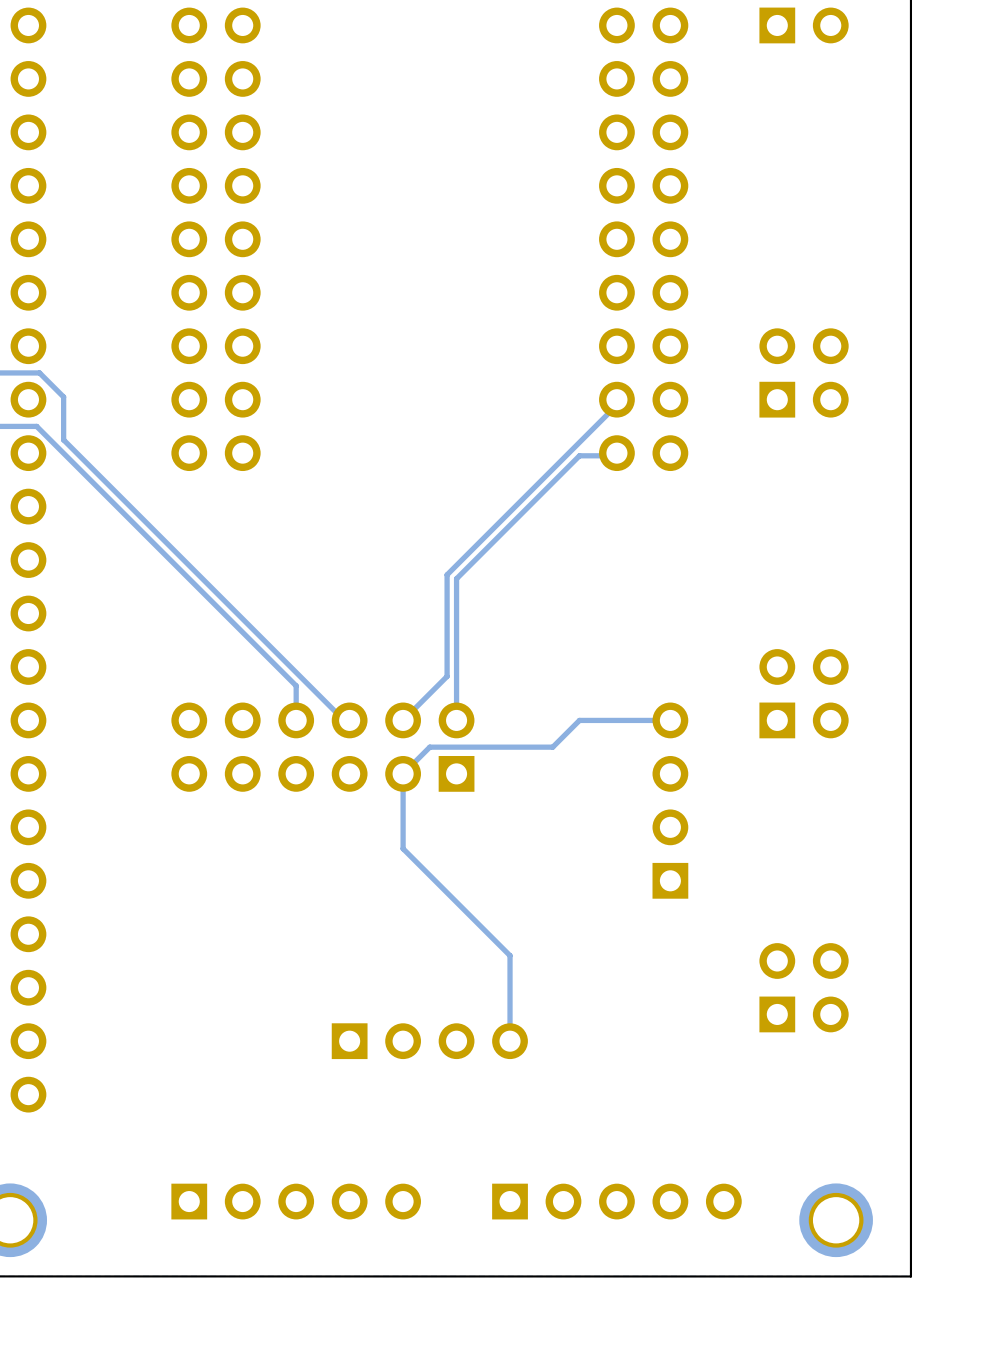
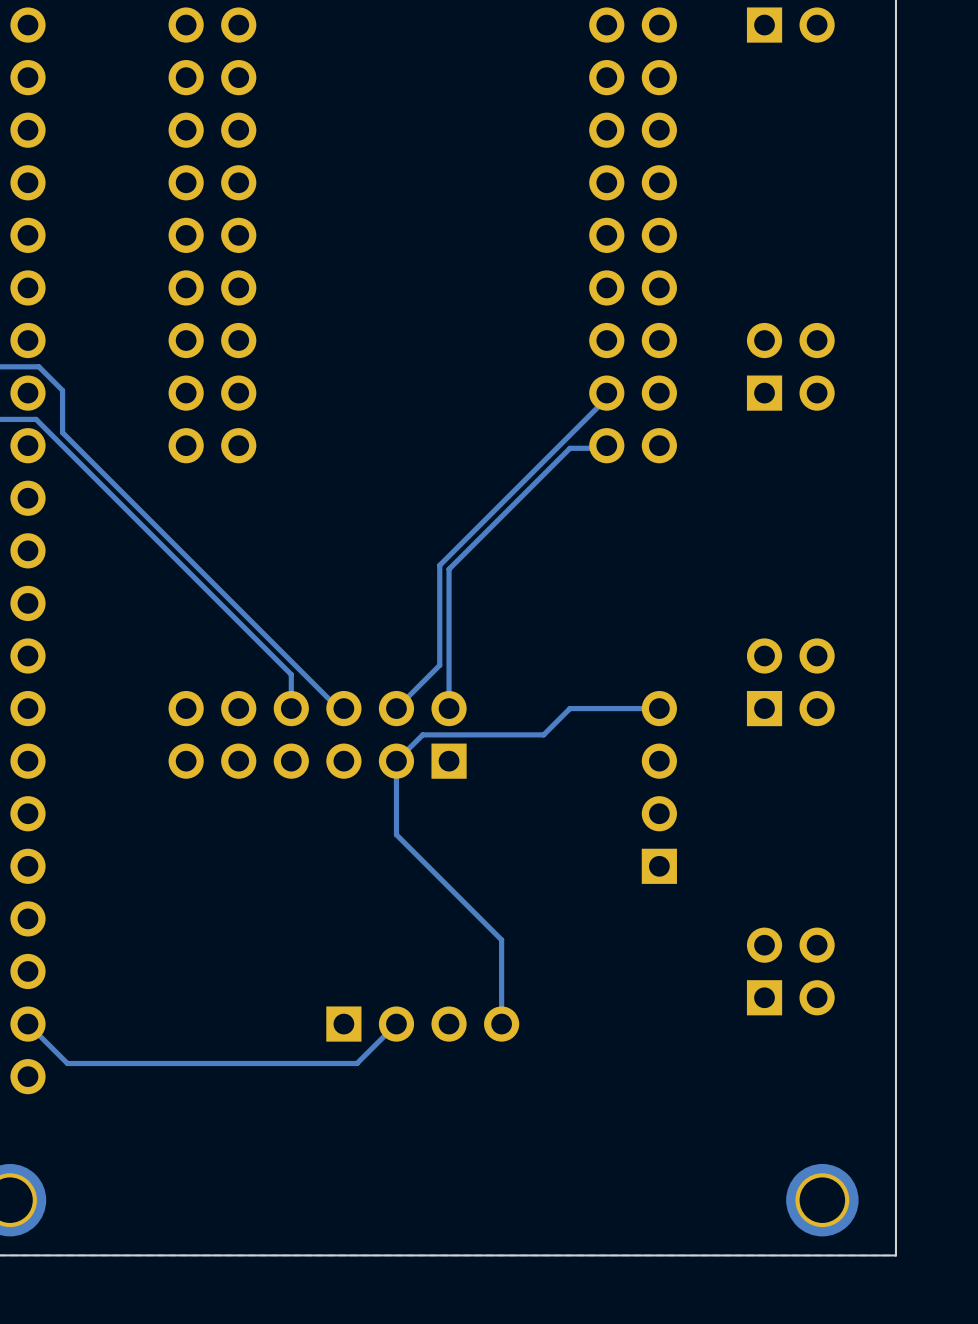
track: none -> (396, 1024) (357, 1063) (67, 1063) (28, 1024)
part: (296, 1201) -> none
part: (616, 1201) -> none

